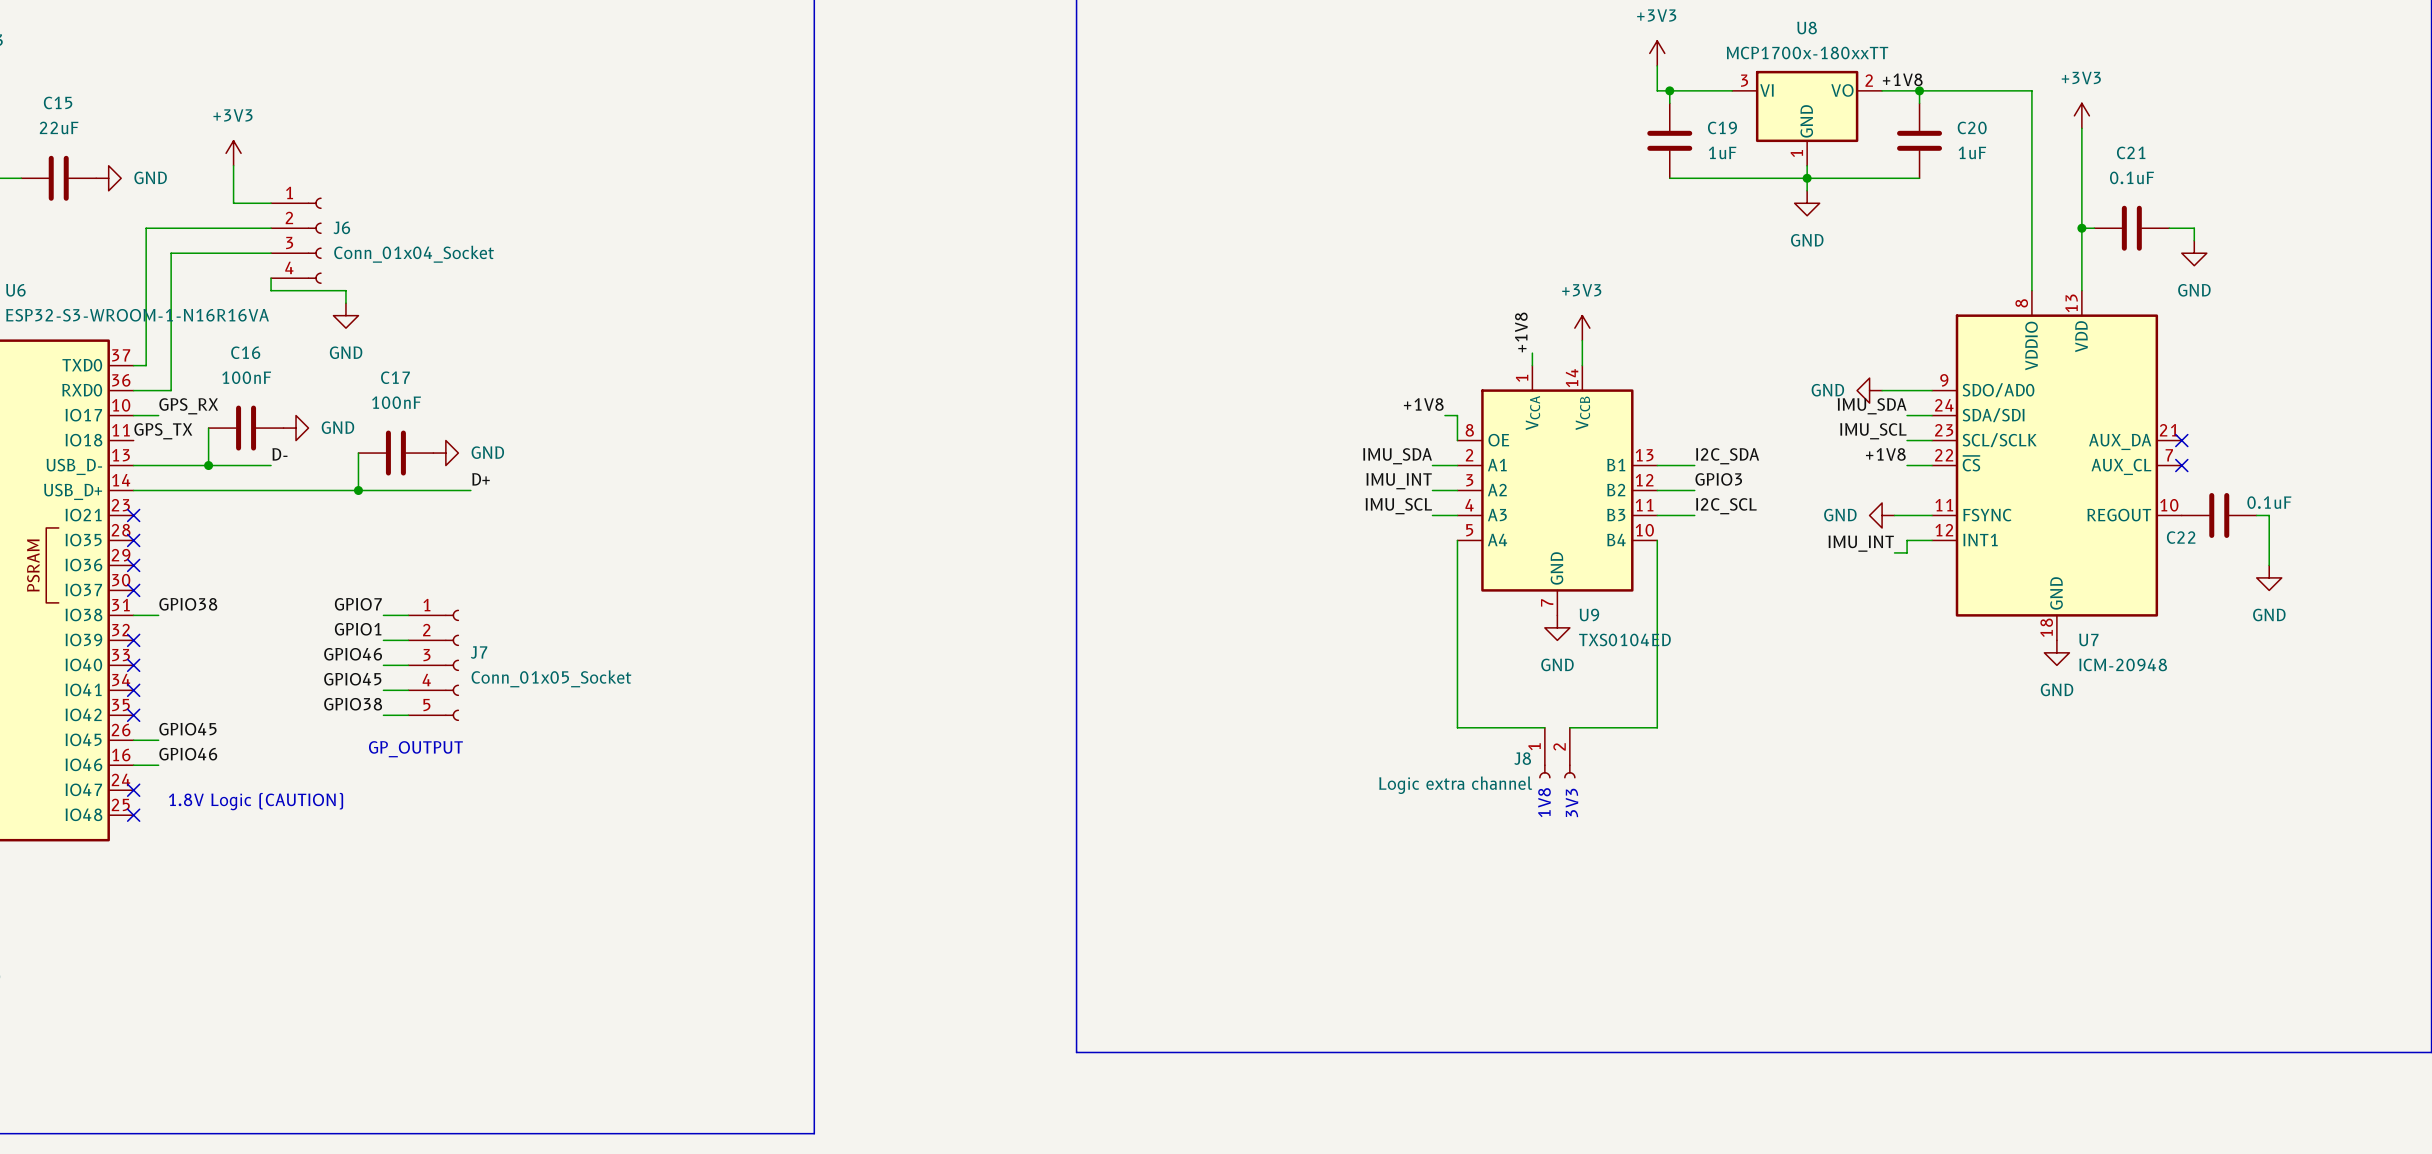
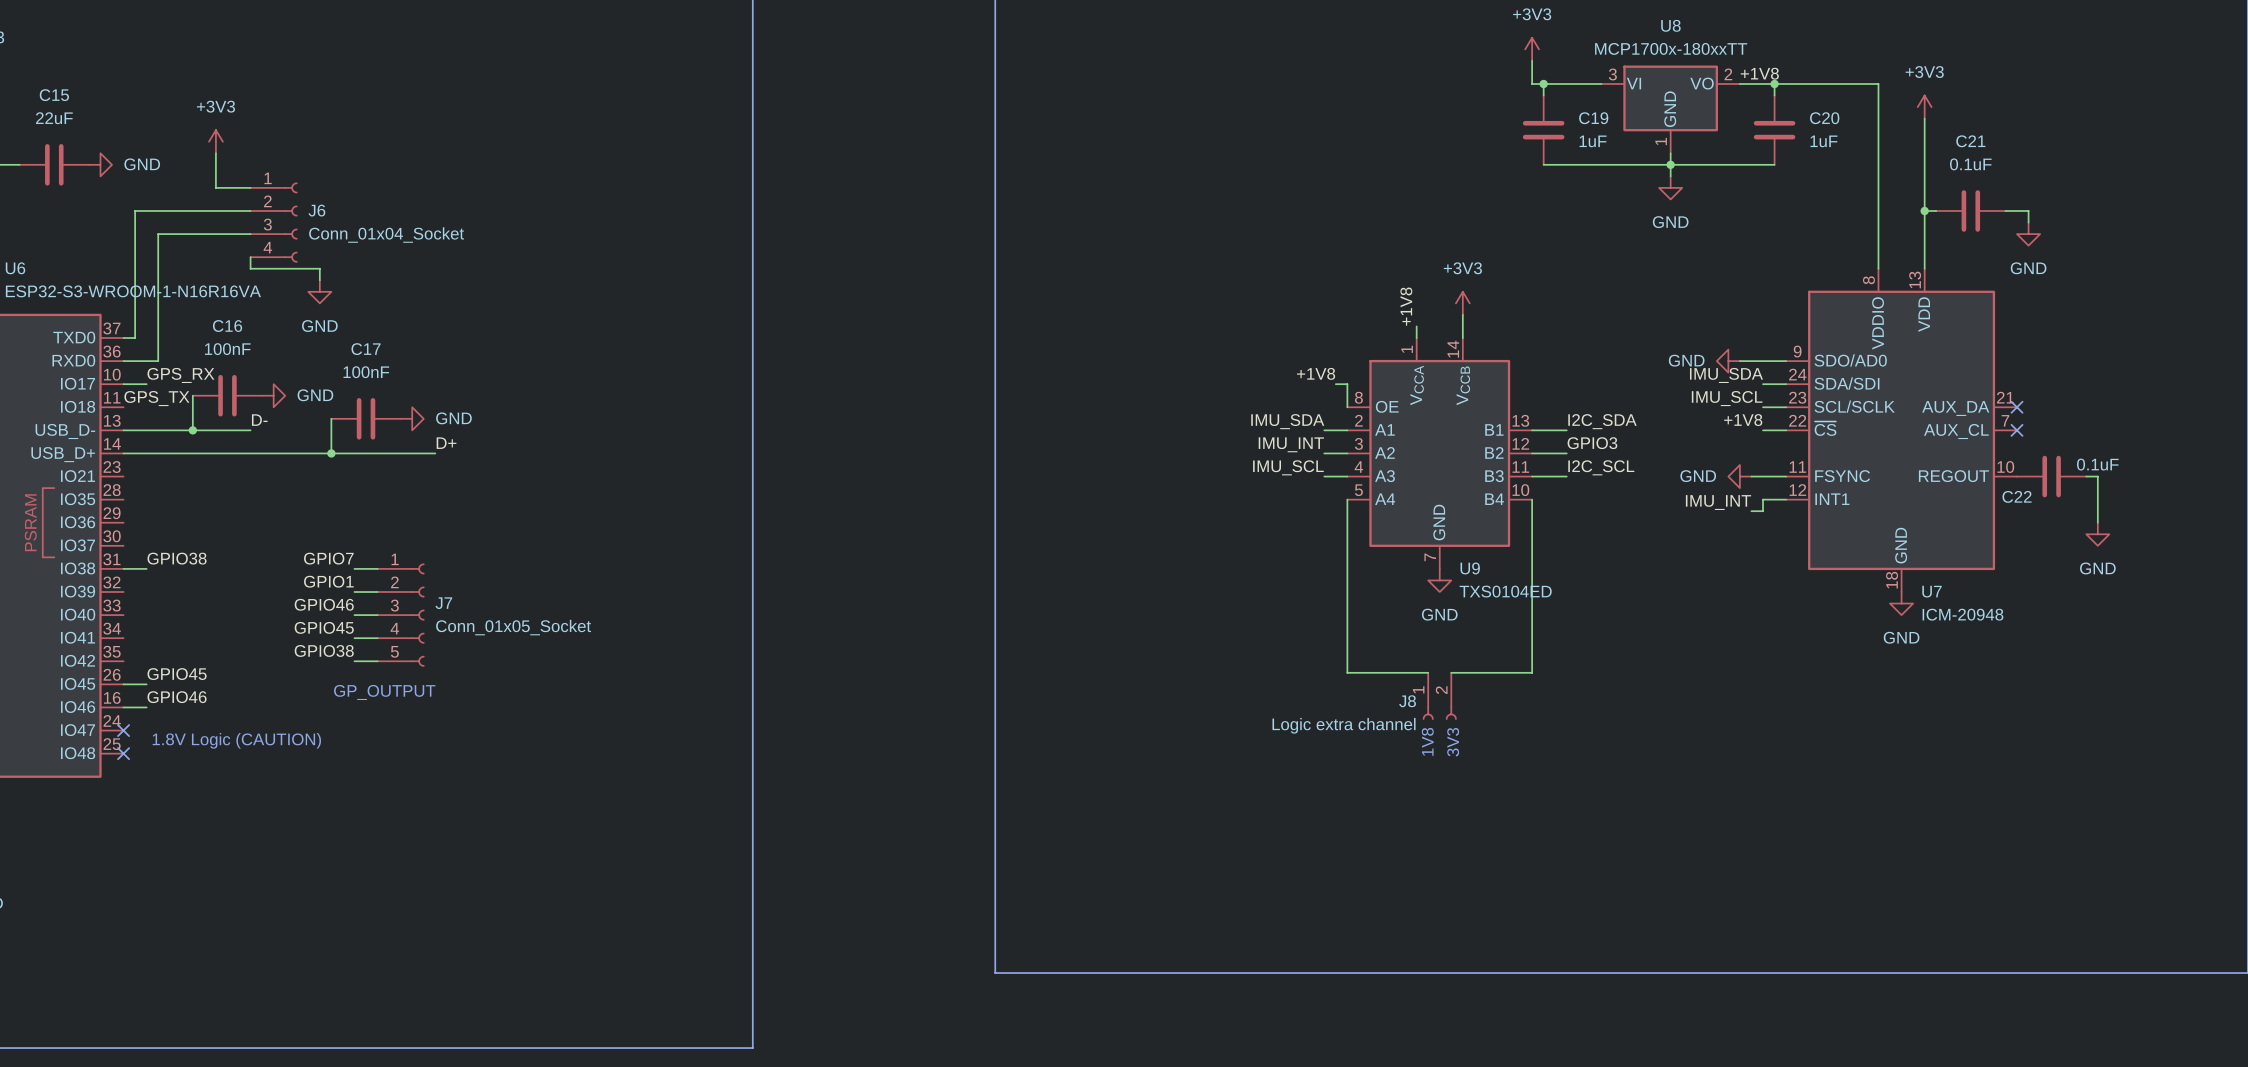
no-connect mark: (133, 515) -> none
no-connect mark: (133, 540) -> none
no-connect mark: (133, 565) -> none
no-connect mark: (133, 590) -> none
no-connect mark: (133, 640) -> none
no-connect mark: (133, 665) -> none
no-connect mark: (133, 690) -> none
no-connect mark: (133, 715) -> none

